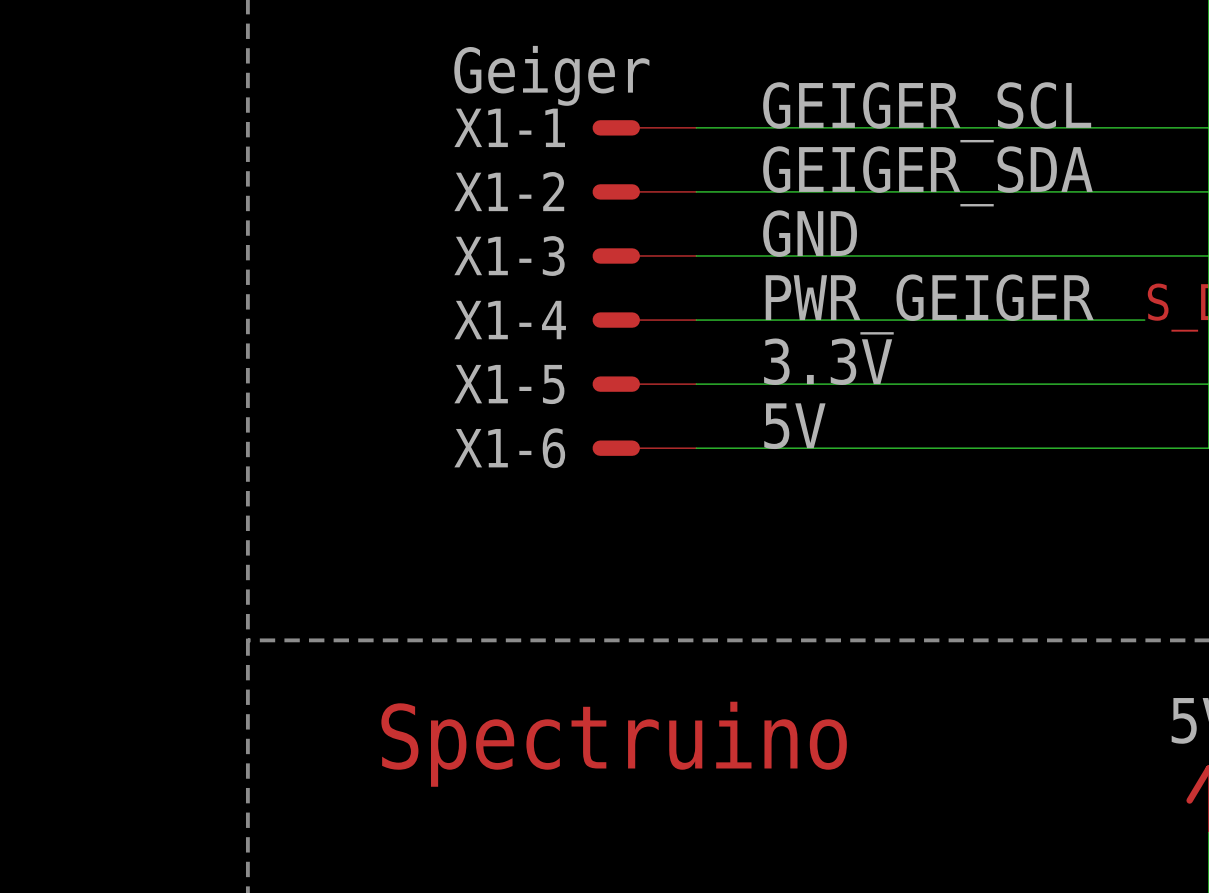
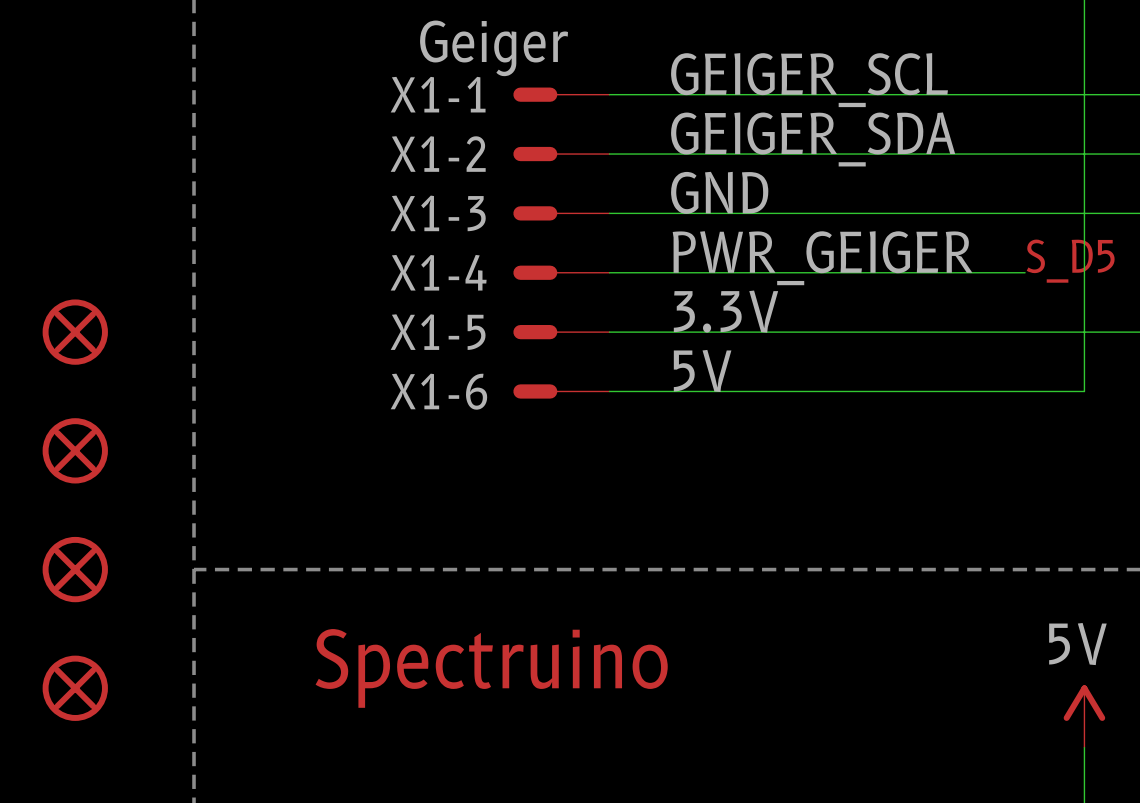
part: none -> (75, 332)
part: none -> (75, 450)
part: none -> (75, 569)
part: none -> (75, 688)

